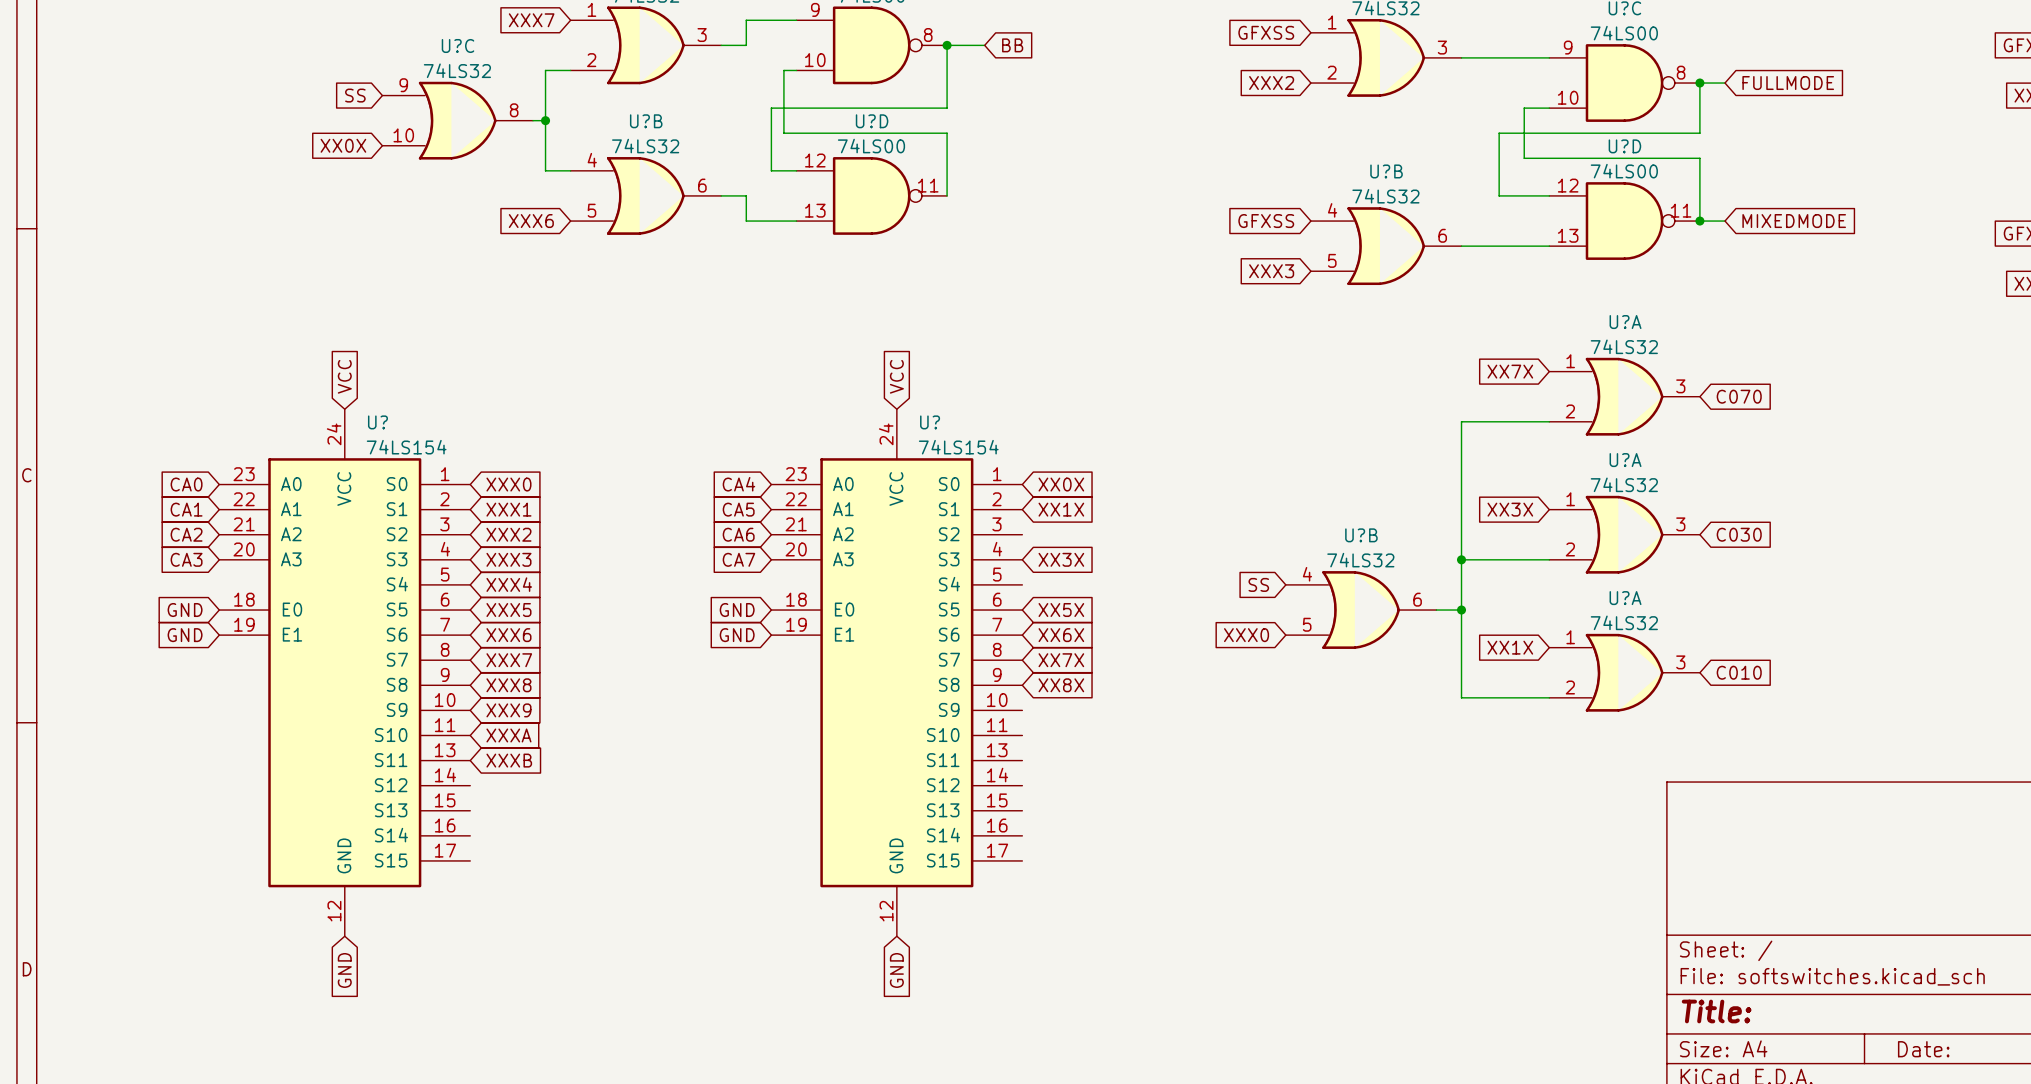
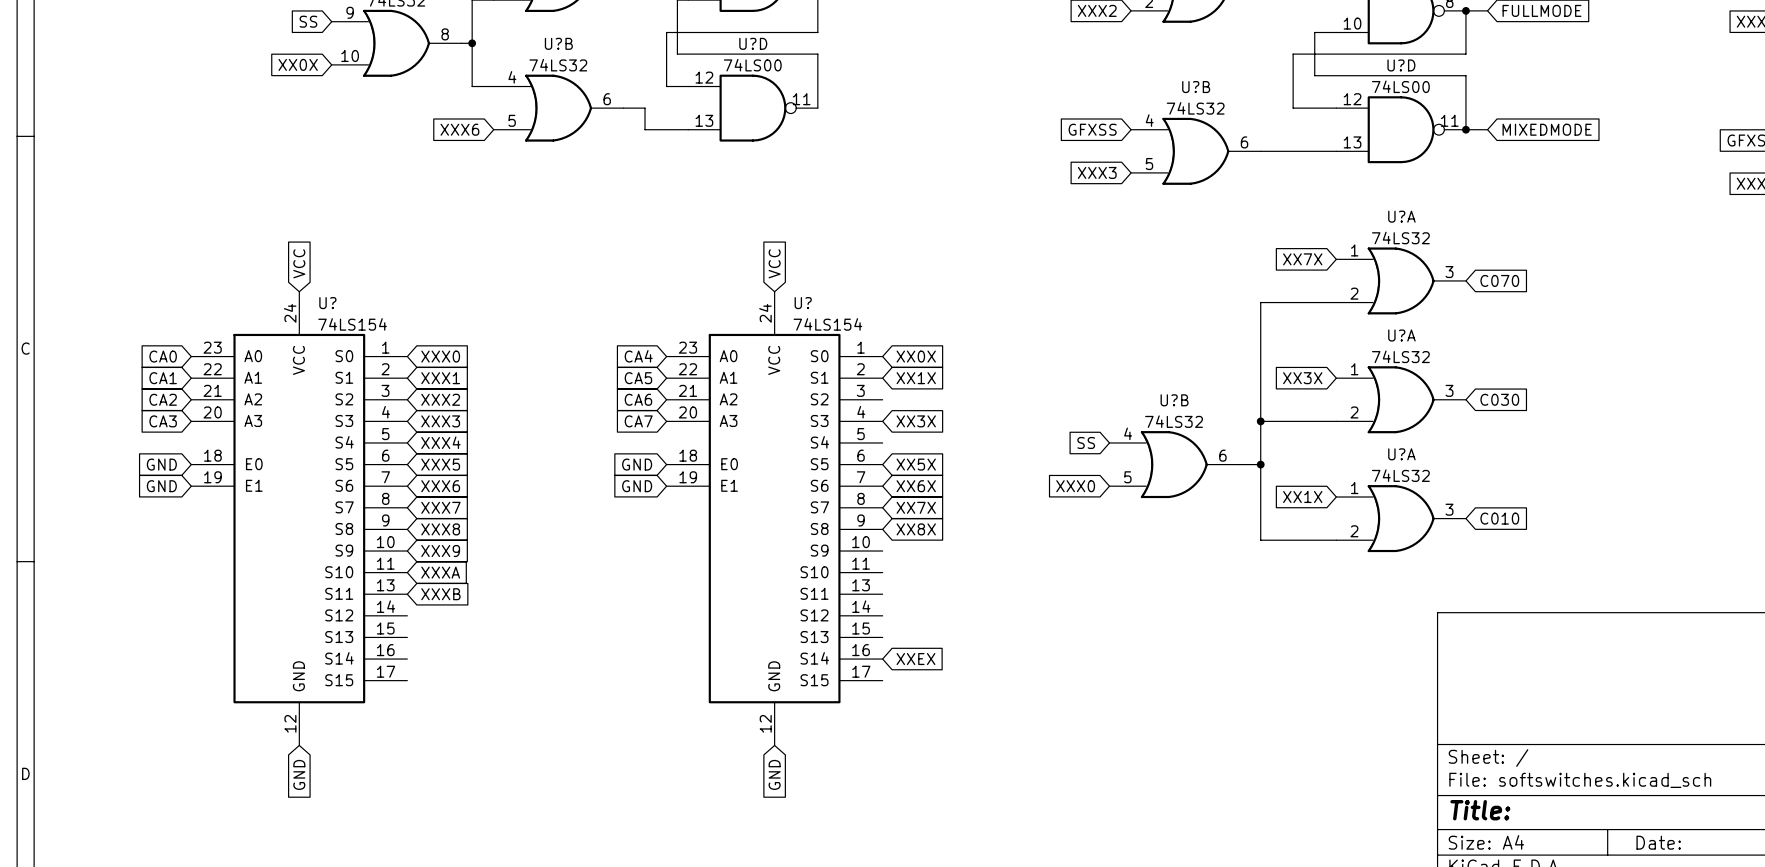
global label: none -> XXEX (915, 659)

